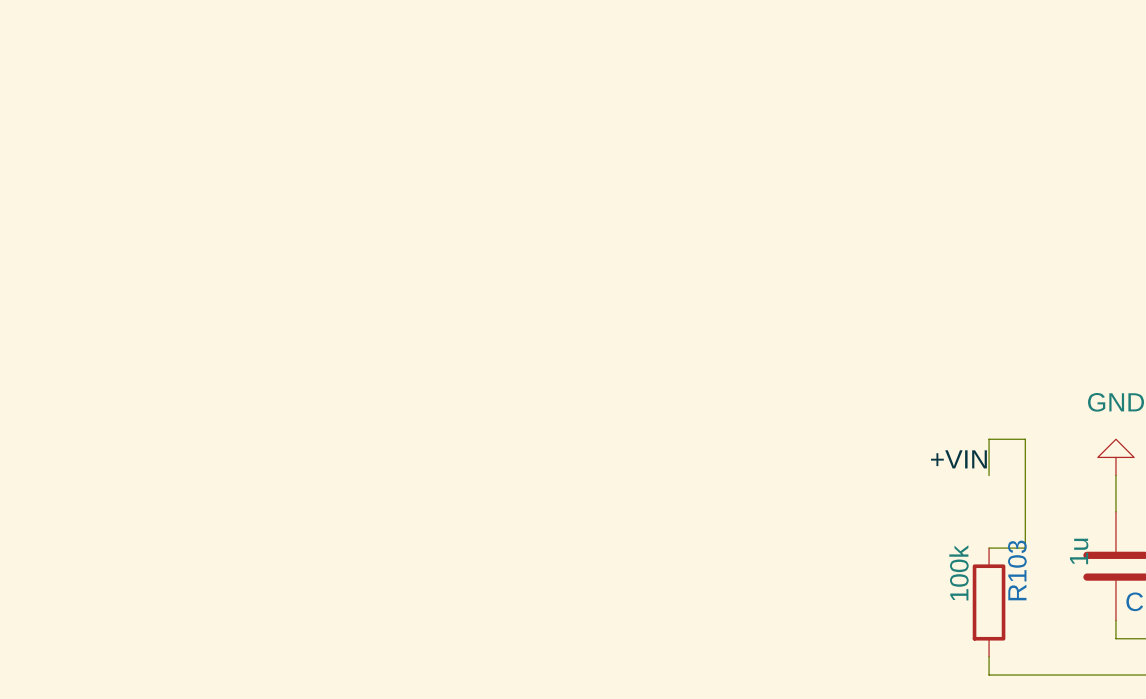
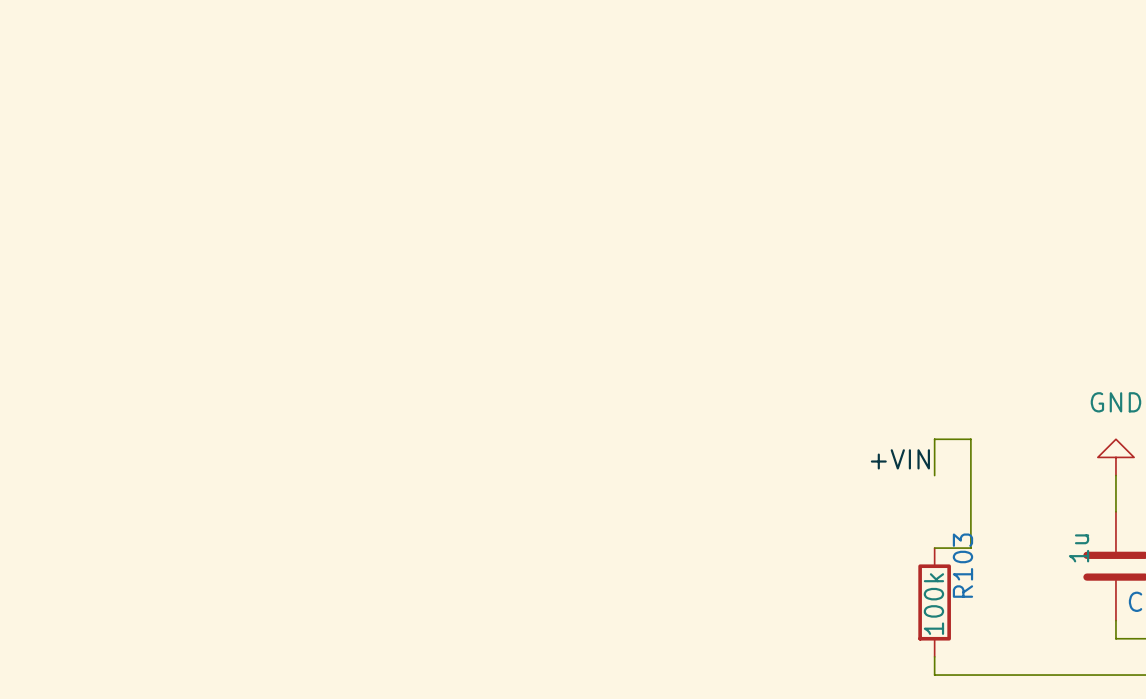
label position: +VIN (958, 459) -> +VIN (900, 459)
wire: (989, 475) (989, 439) (1025, 439) (1025, 548) (989, 548) -> (934, 475) (934, 439) (970, 439) (970, 548) (934, 548)
R103 value position: 100k (958, 572) -> 100k (933, 604)
R103 position: (989, 602) -> (934, 602)
wire: (989, 656) (989, 675) -> (934, 656) (934, 675) (989, 675)

